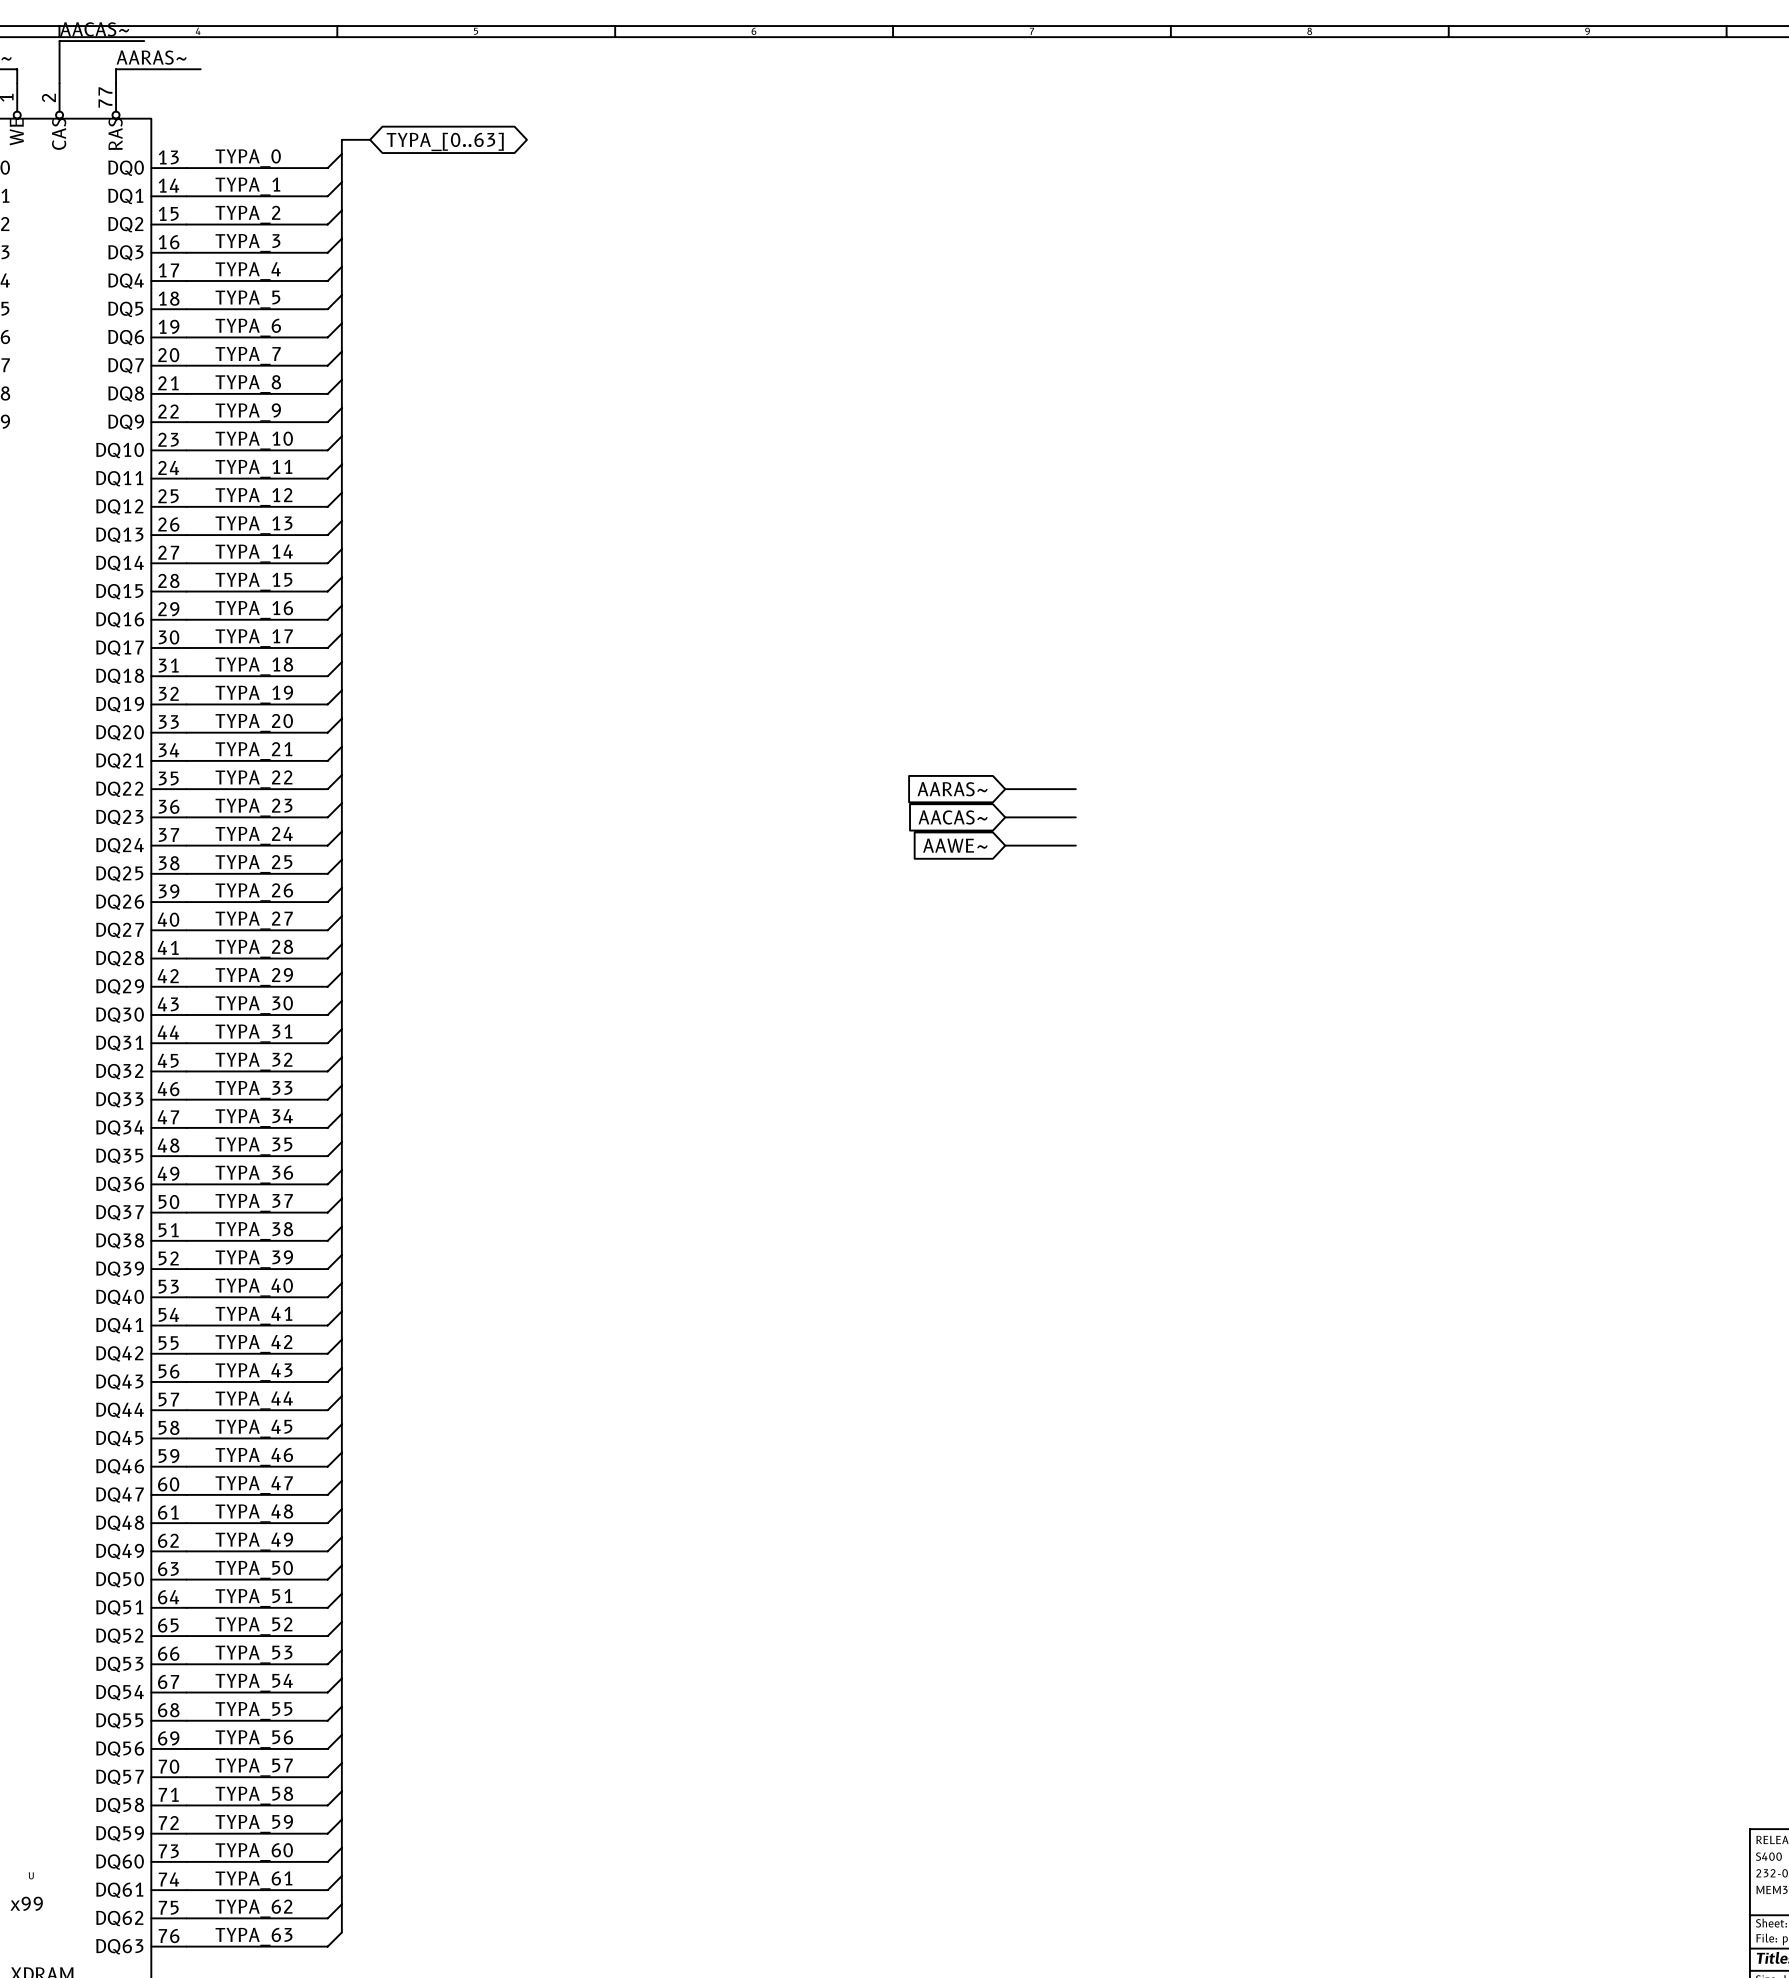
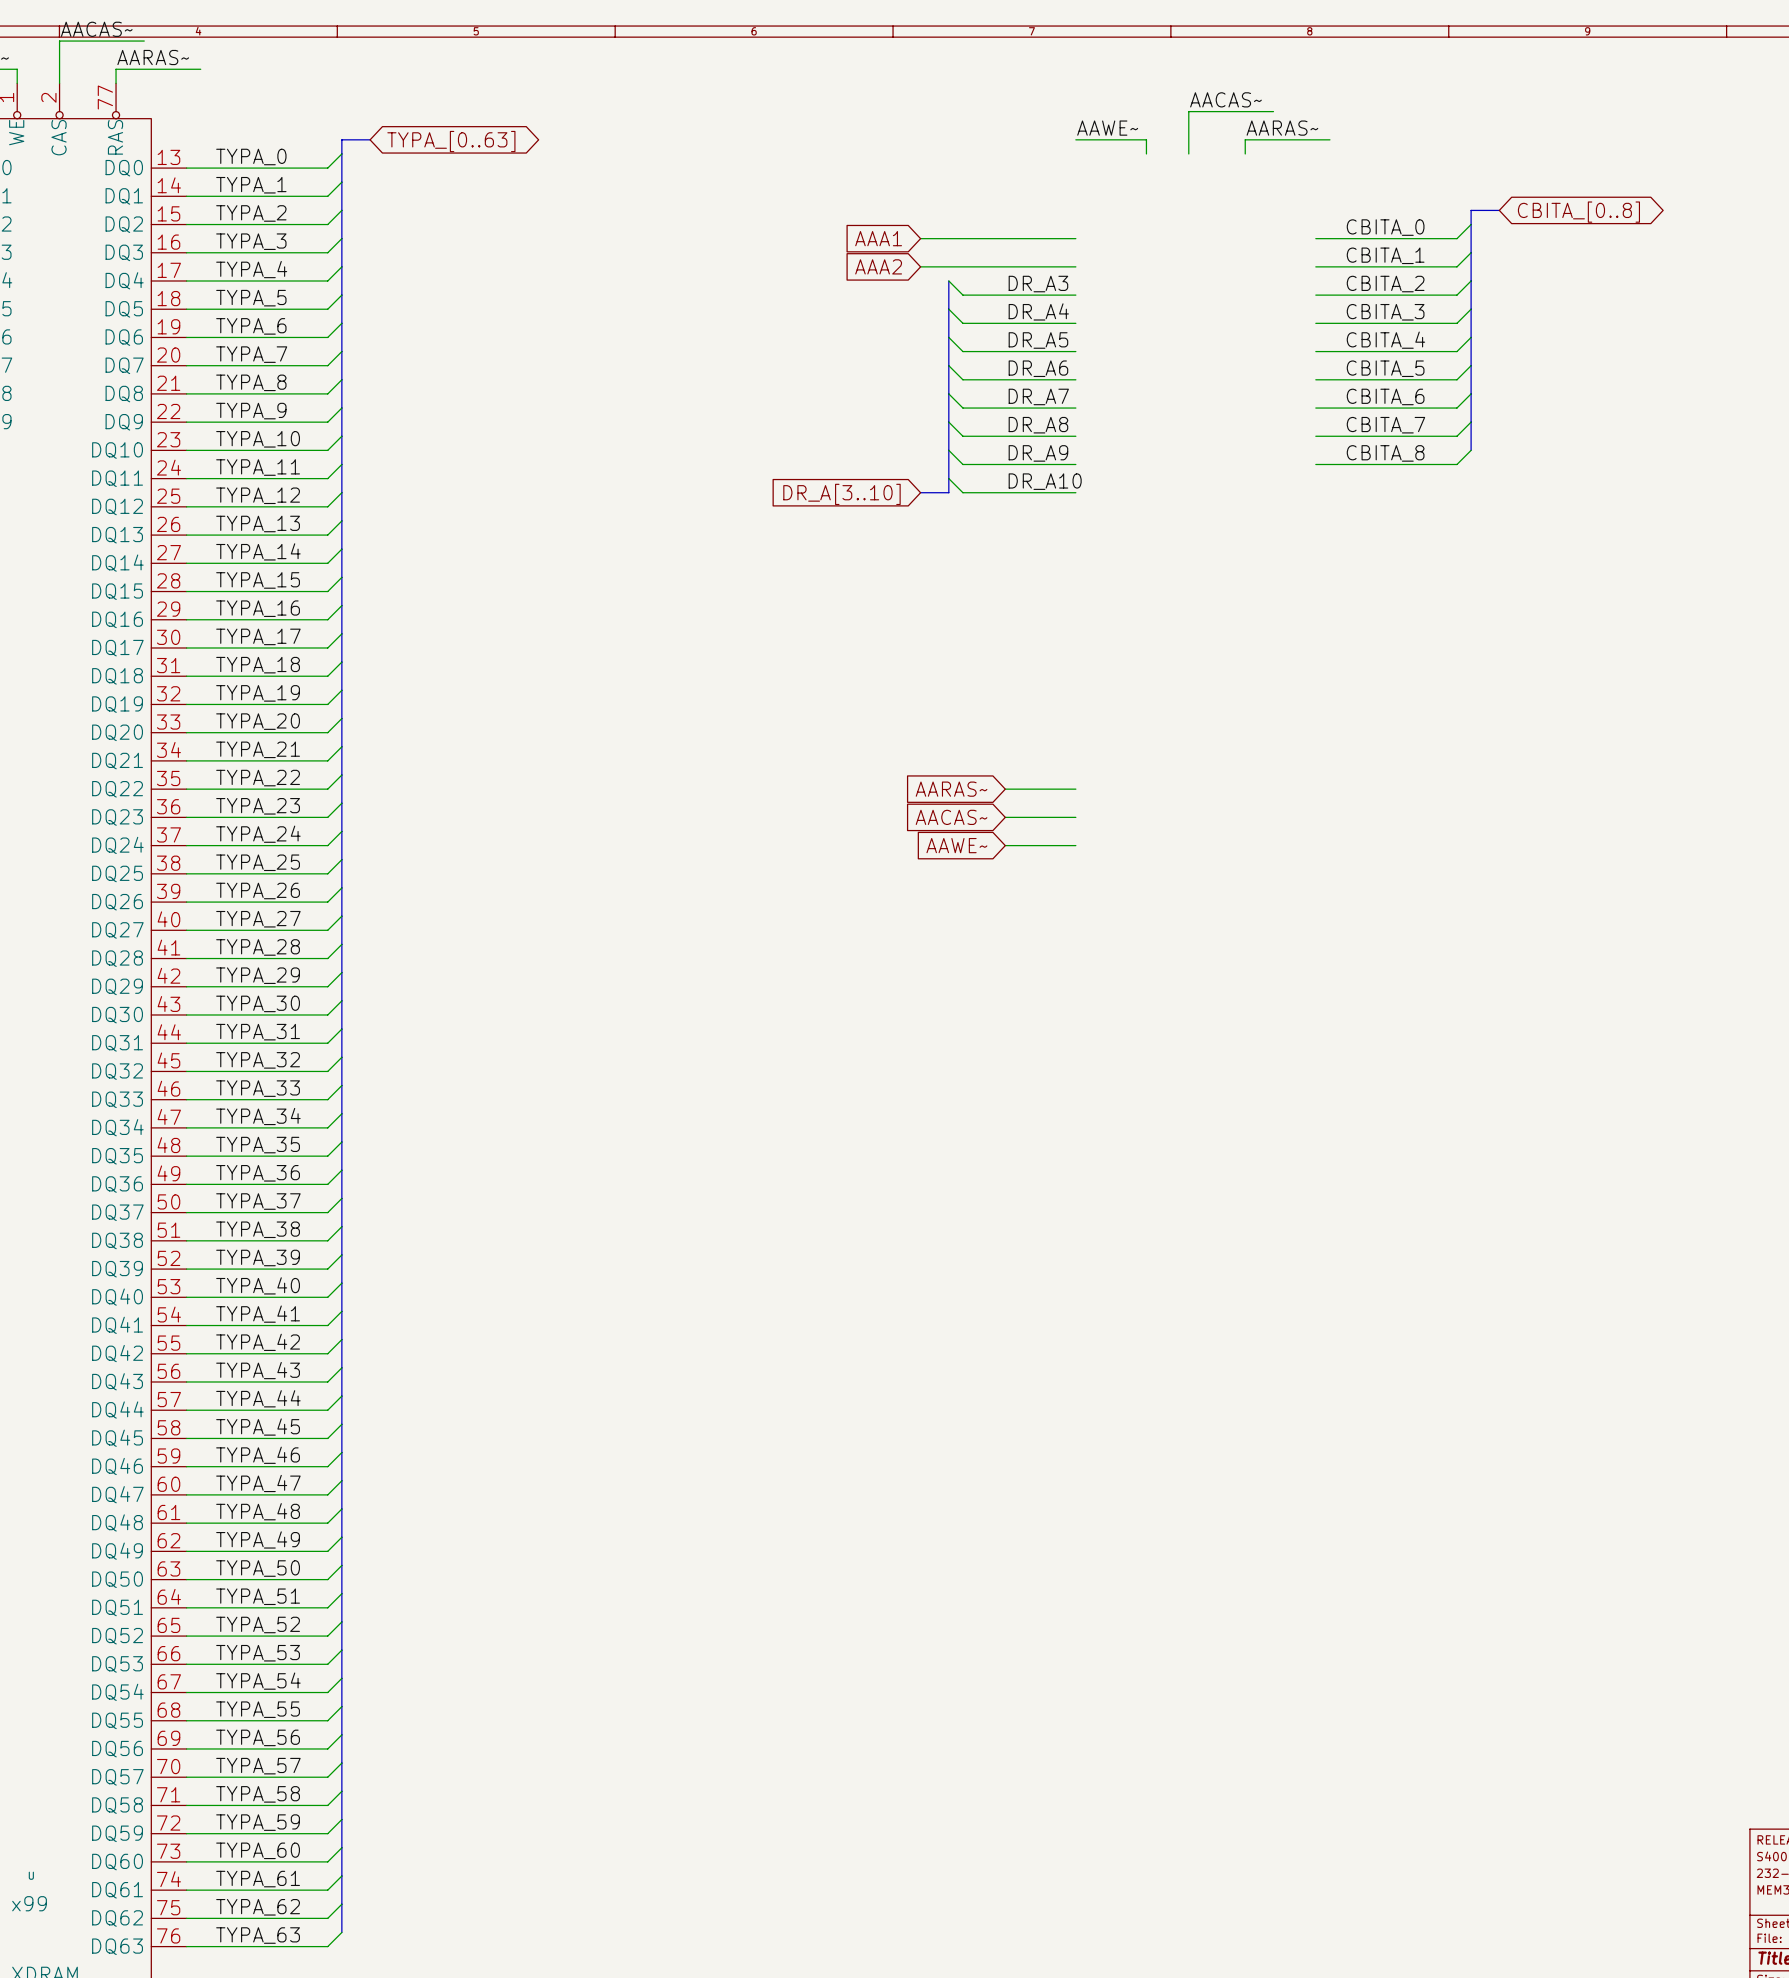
label: none -> AACAS~ (1225, 99)
wire: none -> (1273, 111) (1188, 111) (1188, 153)
label: none -> AAWE~ (1107, 128)
label: none -> AARAS~ (1282, 128)
wire: none -> (1075, 139) (1146, 139) (1146, 153)
wire: none -> (1329, 139) (1245, 139) (1245, 153)
bus: none -> (1499, 210) (1471, 210) (1471, 450)
global label: none -> CBITA_[0..8] (1578, 212)
wire: none -> (1471, 224) (1456, 238) (1315, 238)
label: none -> CBITA_0 (1385, 227)
global label: none -> AAA1 (878, 238)
wire: none -> (920, 238) (1075, 238)
wire: none -> (1471, 252) (1456, 266) (1315, 266)
label: none -> CBITA_1 (1385, 255)
global label: none -> AAA2 (878, 266)
wire: none -> (920, 266) (1075, 266)
wire: none -> (948, 280) (962, 295) (1075, 295)
bus: none -> (948, 280) (948, 492) (920, 492)
wire: none -> (1471, 280) (1456, 295) (1315, 295)
label: none -> DR_A3 (1038, 284)
label: none -> CBITA_2 (1385, 284)
wire: none -> (948, 309) (962, 323) (1075, 323)
wire: none -> (1471, 309) (1456, 323) (1315, 323)
label: none -> DR_A4 (1038, 311)
label: none -> CBITA_3 (1385, 312)
wire: none -> (948, 337) (962, 351) (1075, 351)
wire: none -> (1471, 337) (1456, 351) (1315, 351)
label: none -> DR_A5 (1038, 340)
label: none -> CBITA_4 (1385, 340)
wire: none -> (948, 365) (962, 379) (1075, 379)
wire: none -> (1471, 365) (1456, 379) (1315, 379)
label: none -> DR_A6 (1038, 368)
label: none -> CBITA_5 (1385, 368)
wire: none -> (948, 393) (962, 408) (1075, 408)
wire: none -> (1471, 393) (1456, 408) (1315, 408)
label: none -> DR_A7 (1038, 396)
label: none -> CBITA_6 (1385, 396)
wire: none -> (948, 422) (962, 436) (1075, 436)
wire: none -> (1471, 422) (1456, 436) (1315, 436)
label: none -> DR_A8 (1038, 425)
label: none -> CBITA_7 (1385, 425)
wire: none -> (948, 450) (962, 464) (1075, 464)
wire: none -> (1471, 450) (1456, 464) (1315, 464)
label: none -> DR_A9 (1038, 453)
label: none -> CBITA_8 (1385, 453)
wire: none -> (948, 478) (962, 492) (1075, 492)
label: none -> DR_A10 (1045, 481)
global label: none -> DR_A[3..10] (841, 494)

